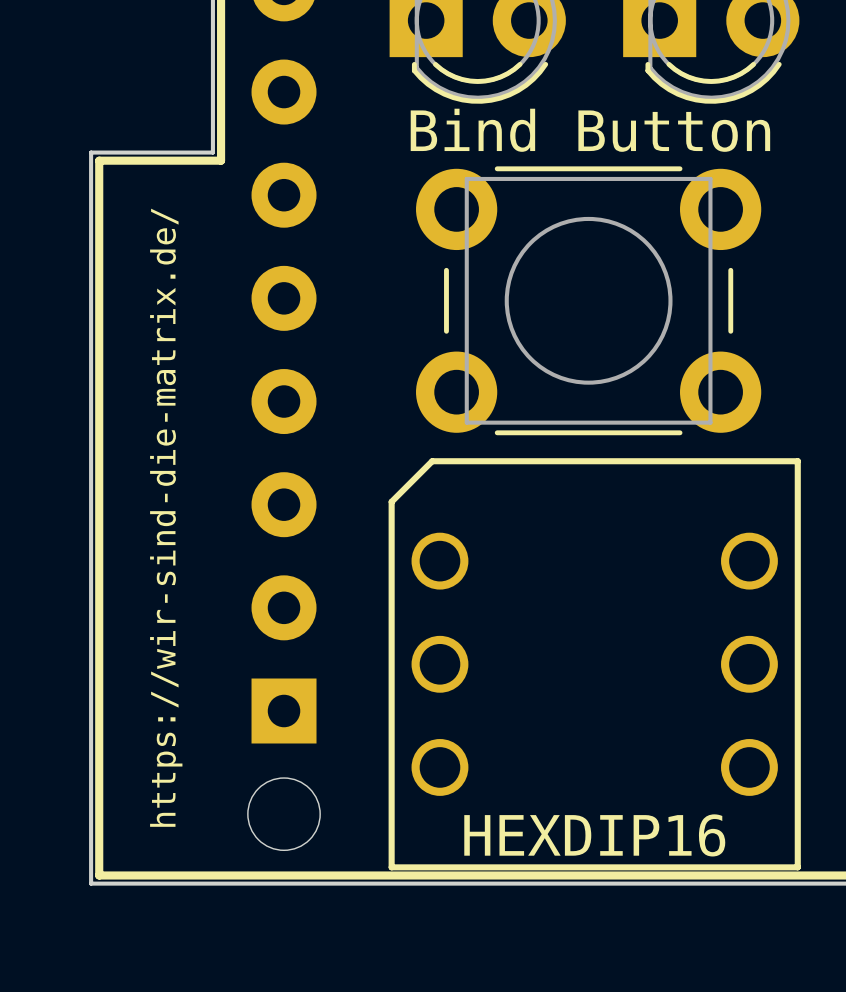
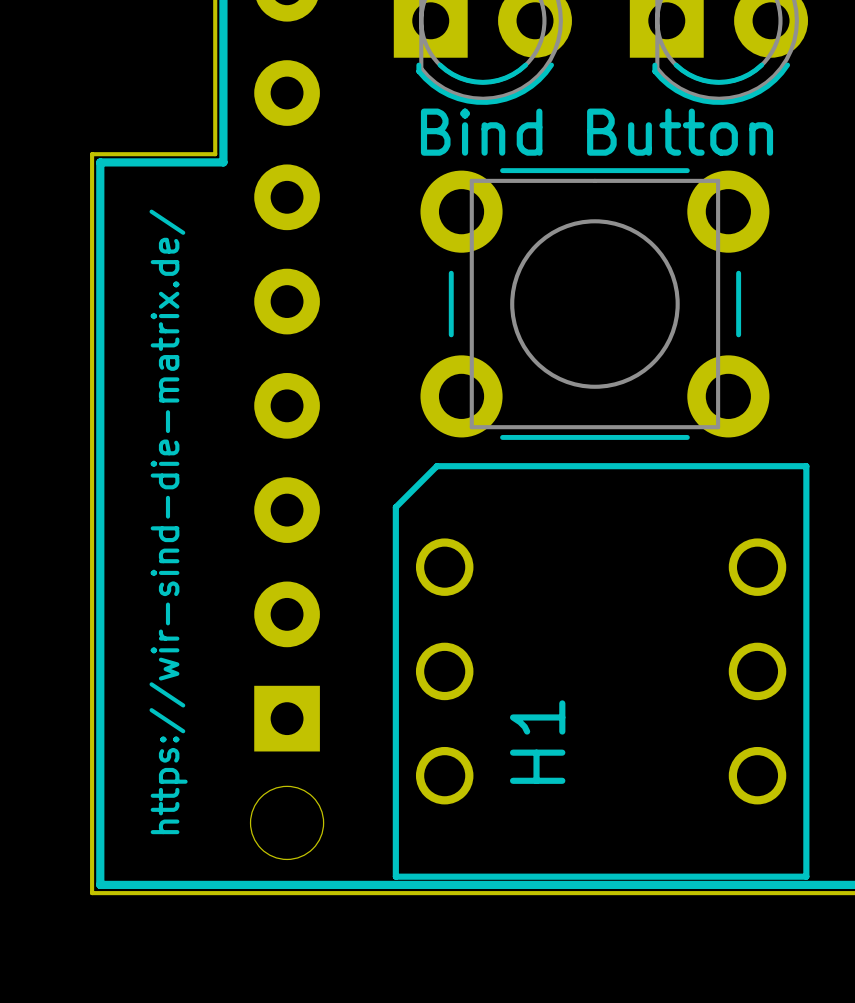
H1 name: none -> H1 (537, 742)
H1 value: HEXDIP16 (594, 835) -> none

